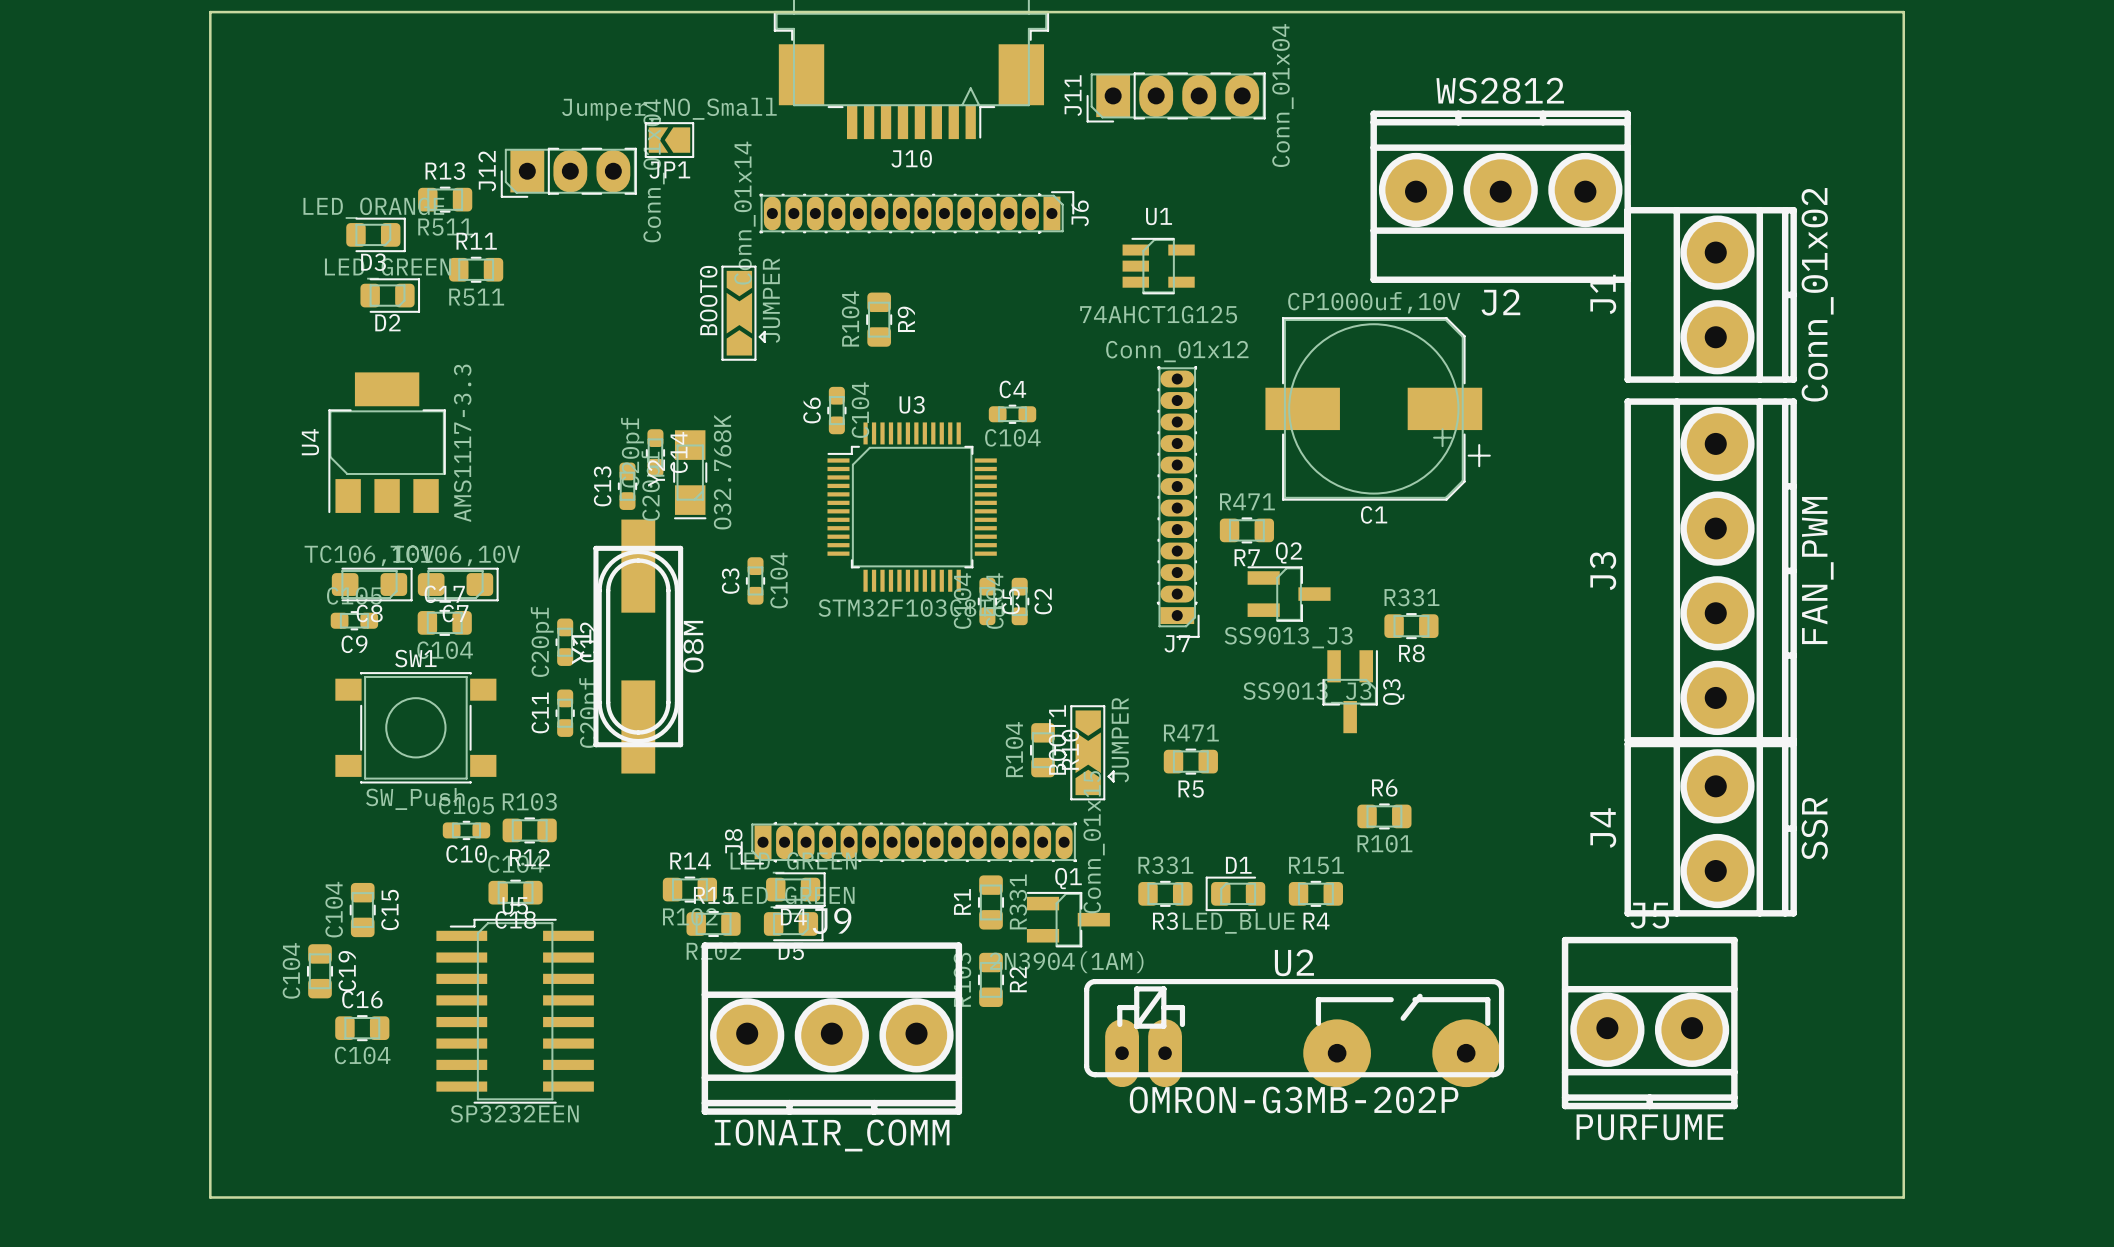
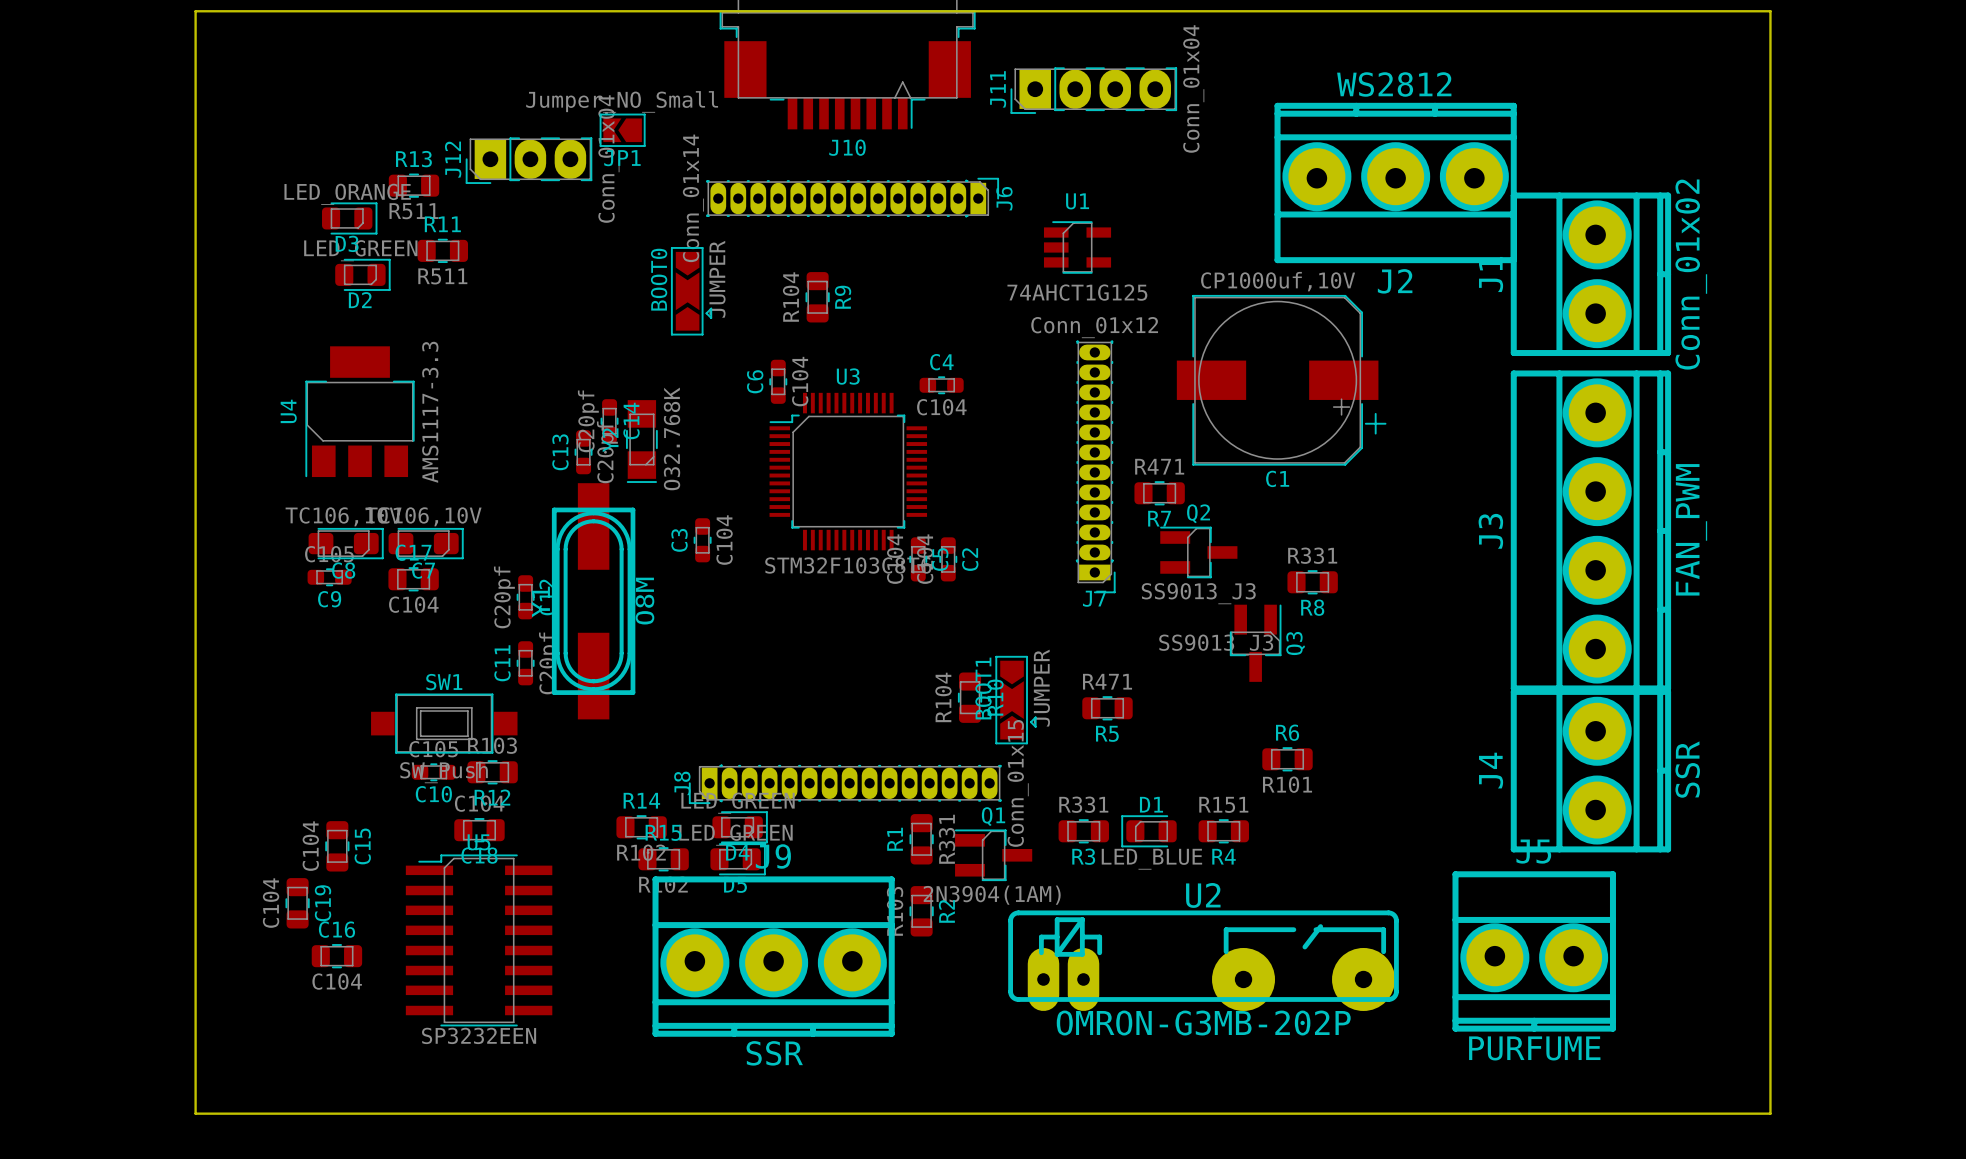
SW1 footprint: [335, 672, 497, 784] -> [371, 693, 518, 754]
J9 value: IONAIR_COMM (832, 1135) -> SSR (774, 1053)

